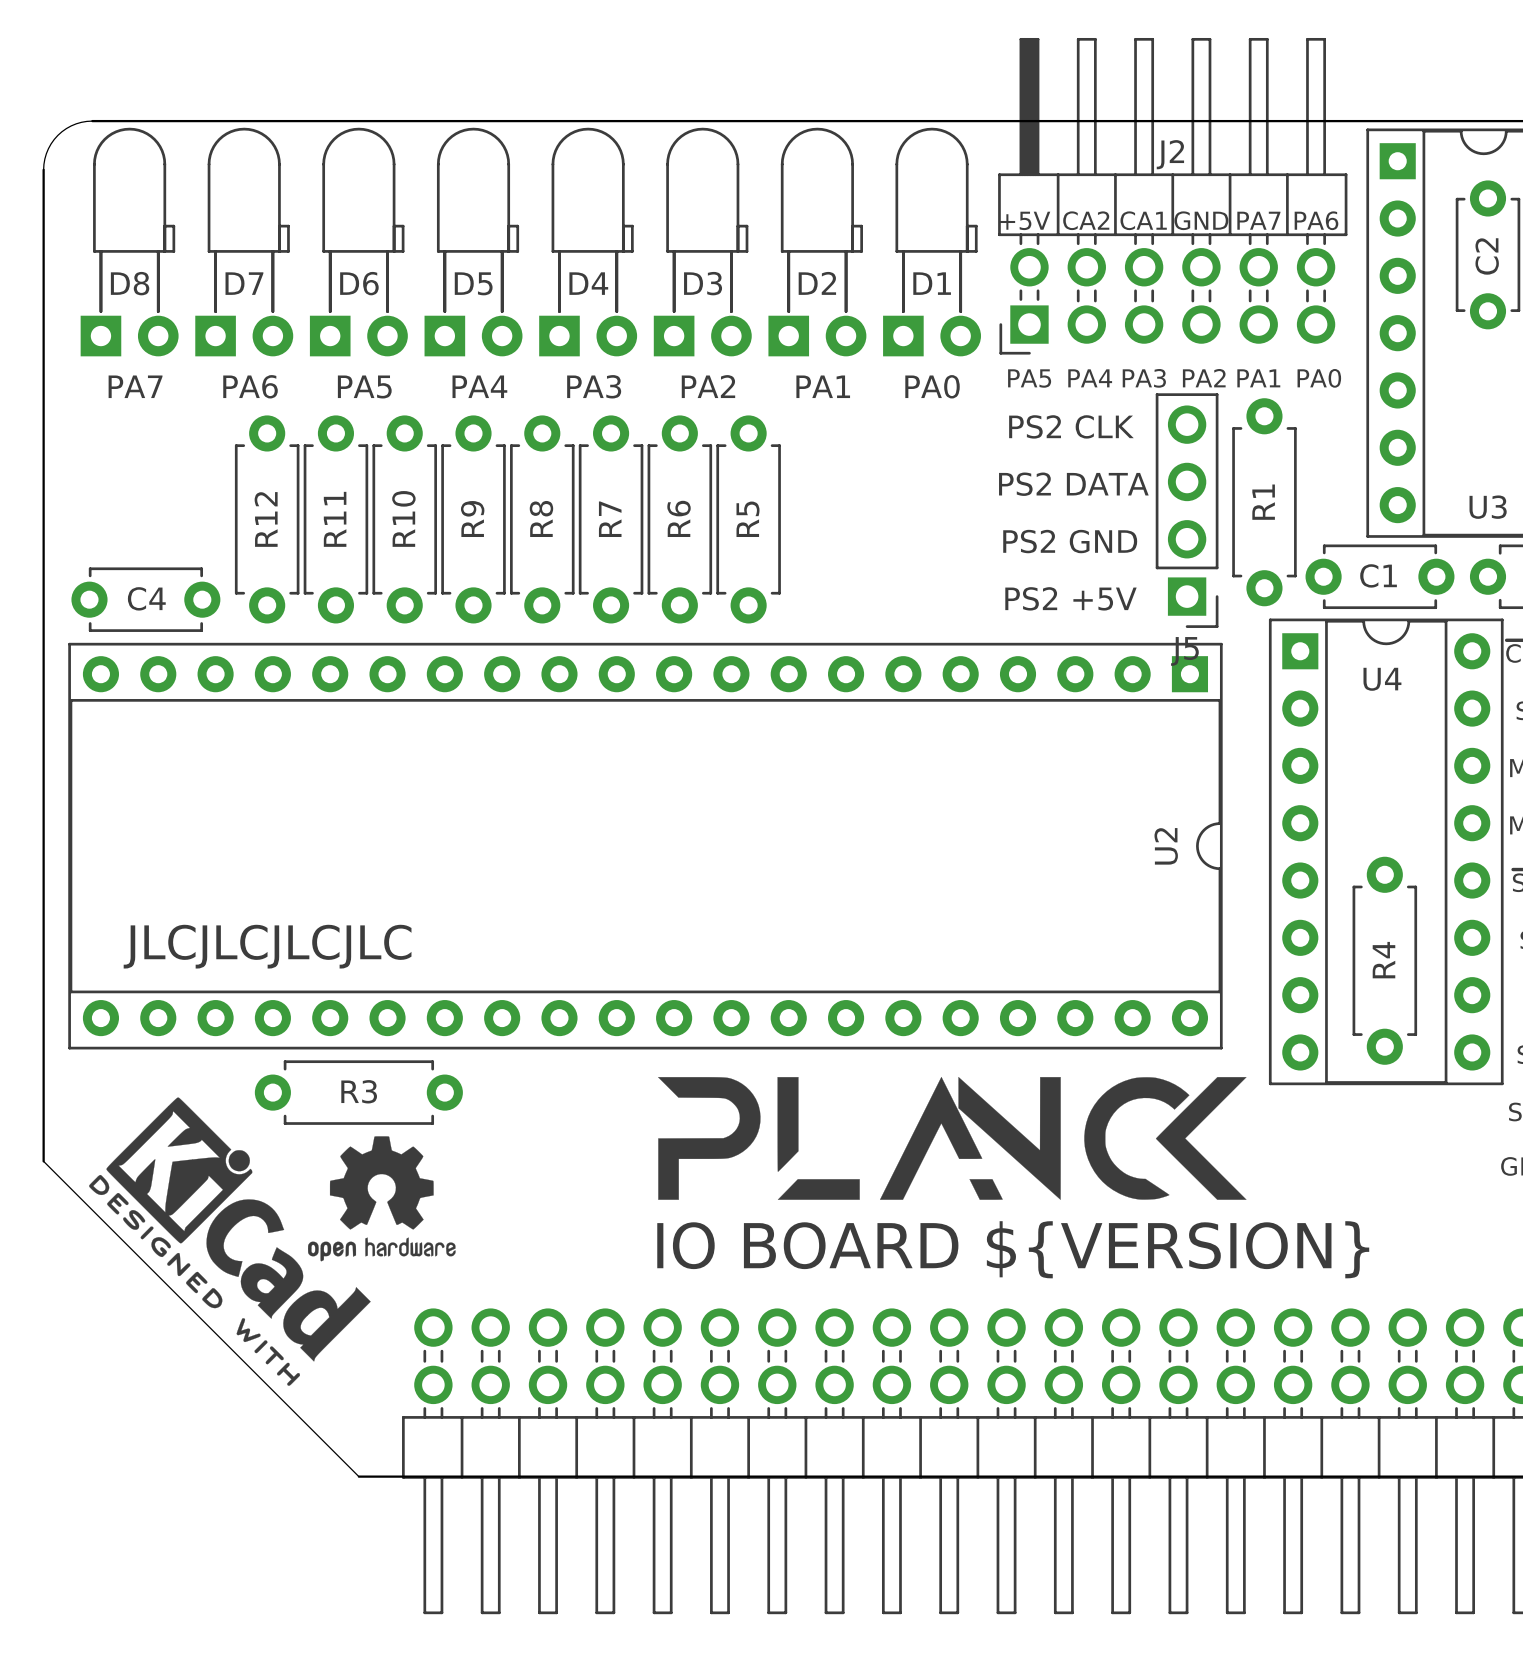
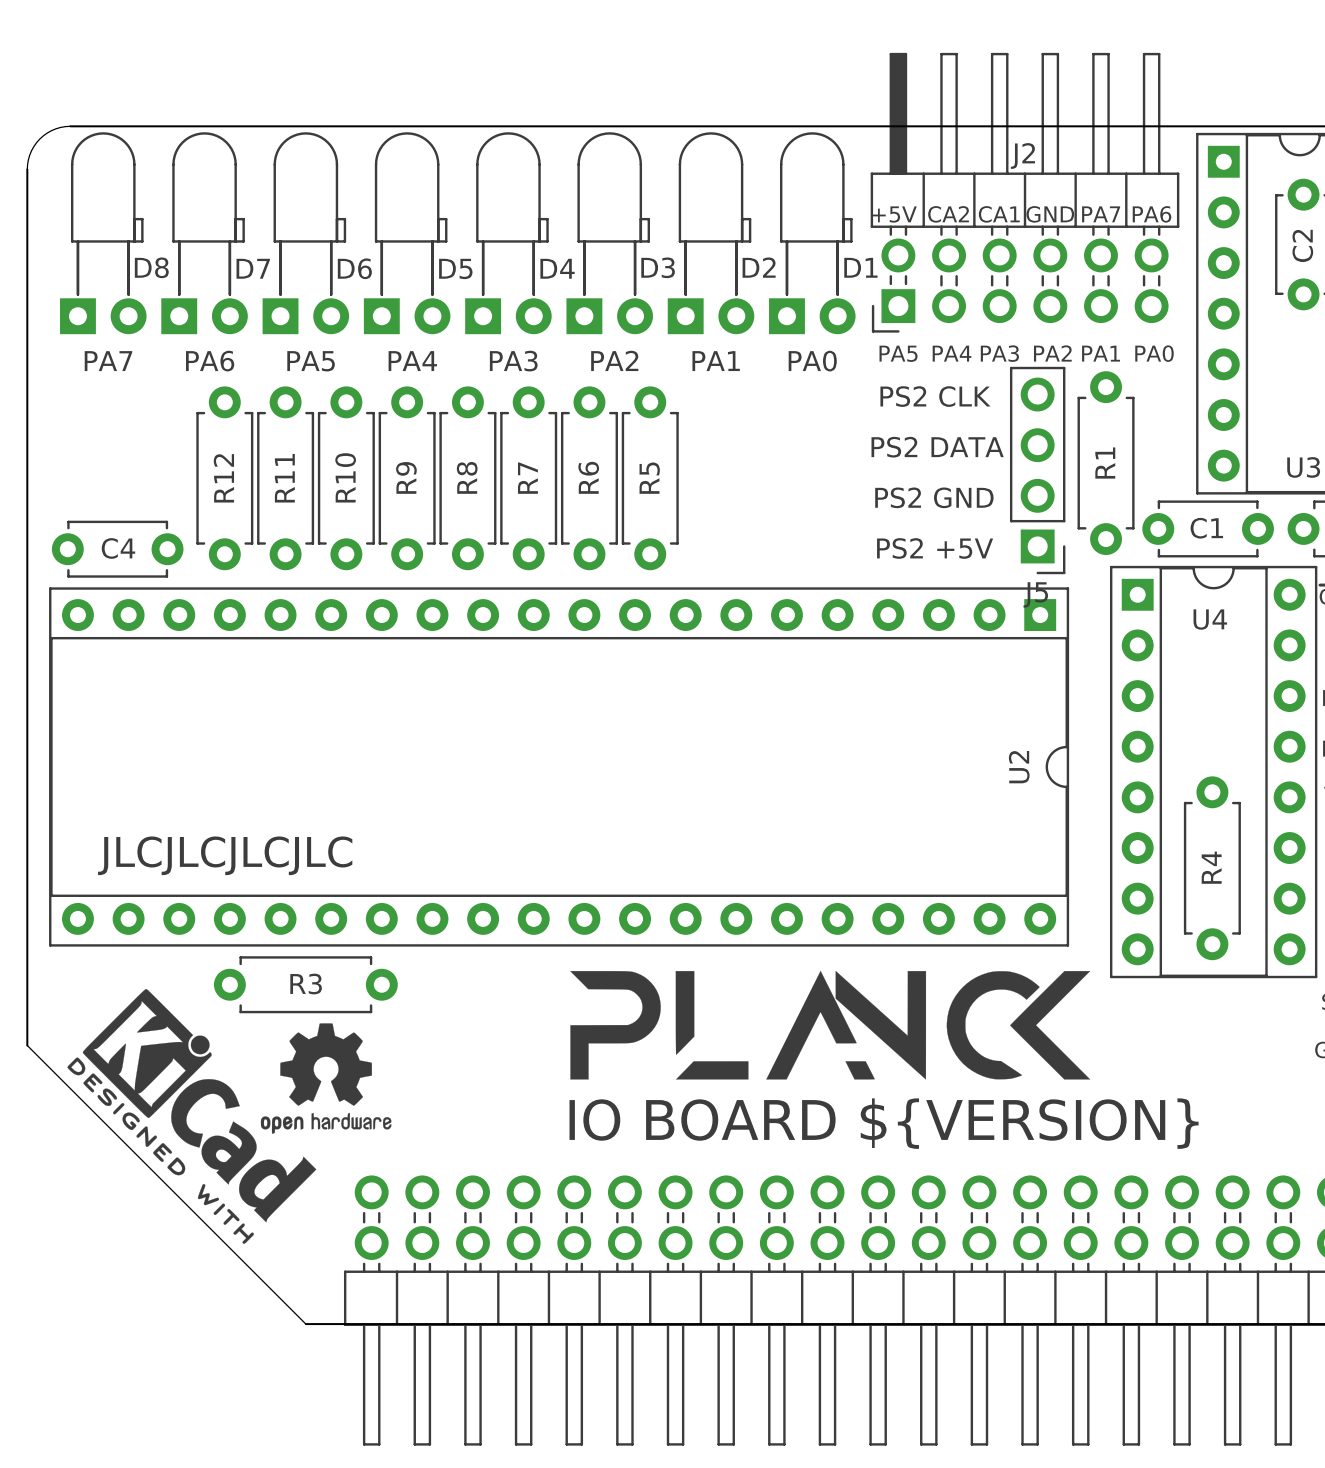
D8 name position: D8 (130, 283) -> D8 (151, 267)
D7 name position: D7 (244, 283) -> D7 (253, 268)
D6 name position: D6 (359, 283) -> D6 (354, 268)
D5 name position: D5 (473, 283) -> D5 (455, 268)
D4 name position: D4 (588, 283) -> D4 (557, 268)
D3 name position: D3 (703, 283) -> D3 (658, 267)
D2 name position: D2 (817, 283) -> D2 (759, 267)
D1 name position: D1 (932, 283) -> D1 (860, 267)

